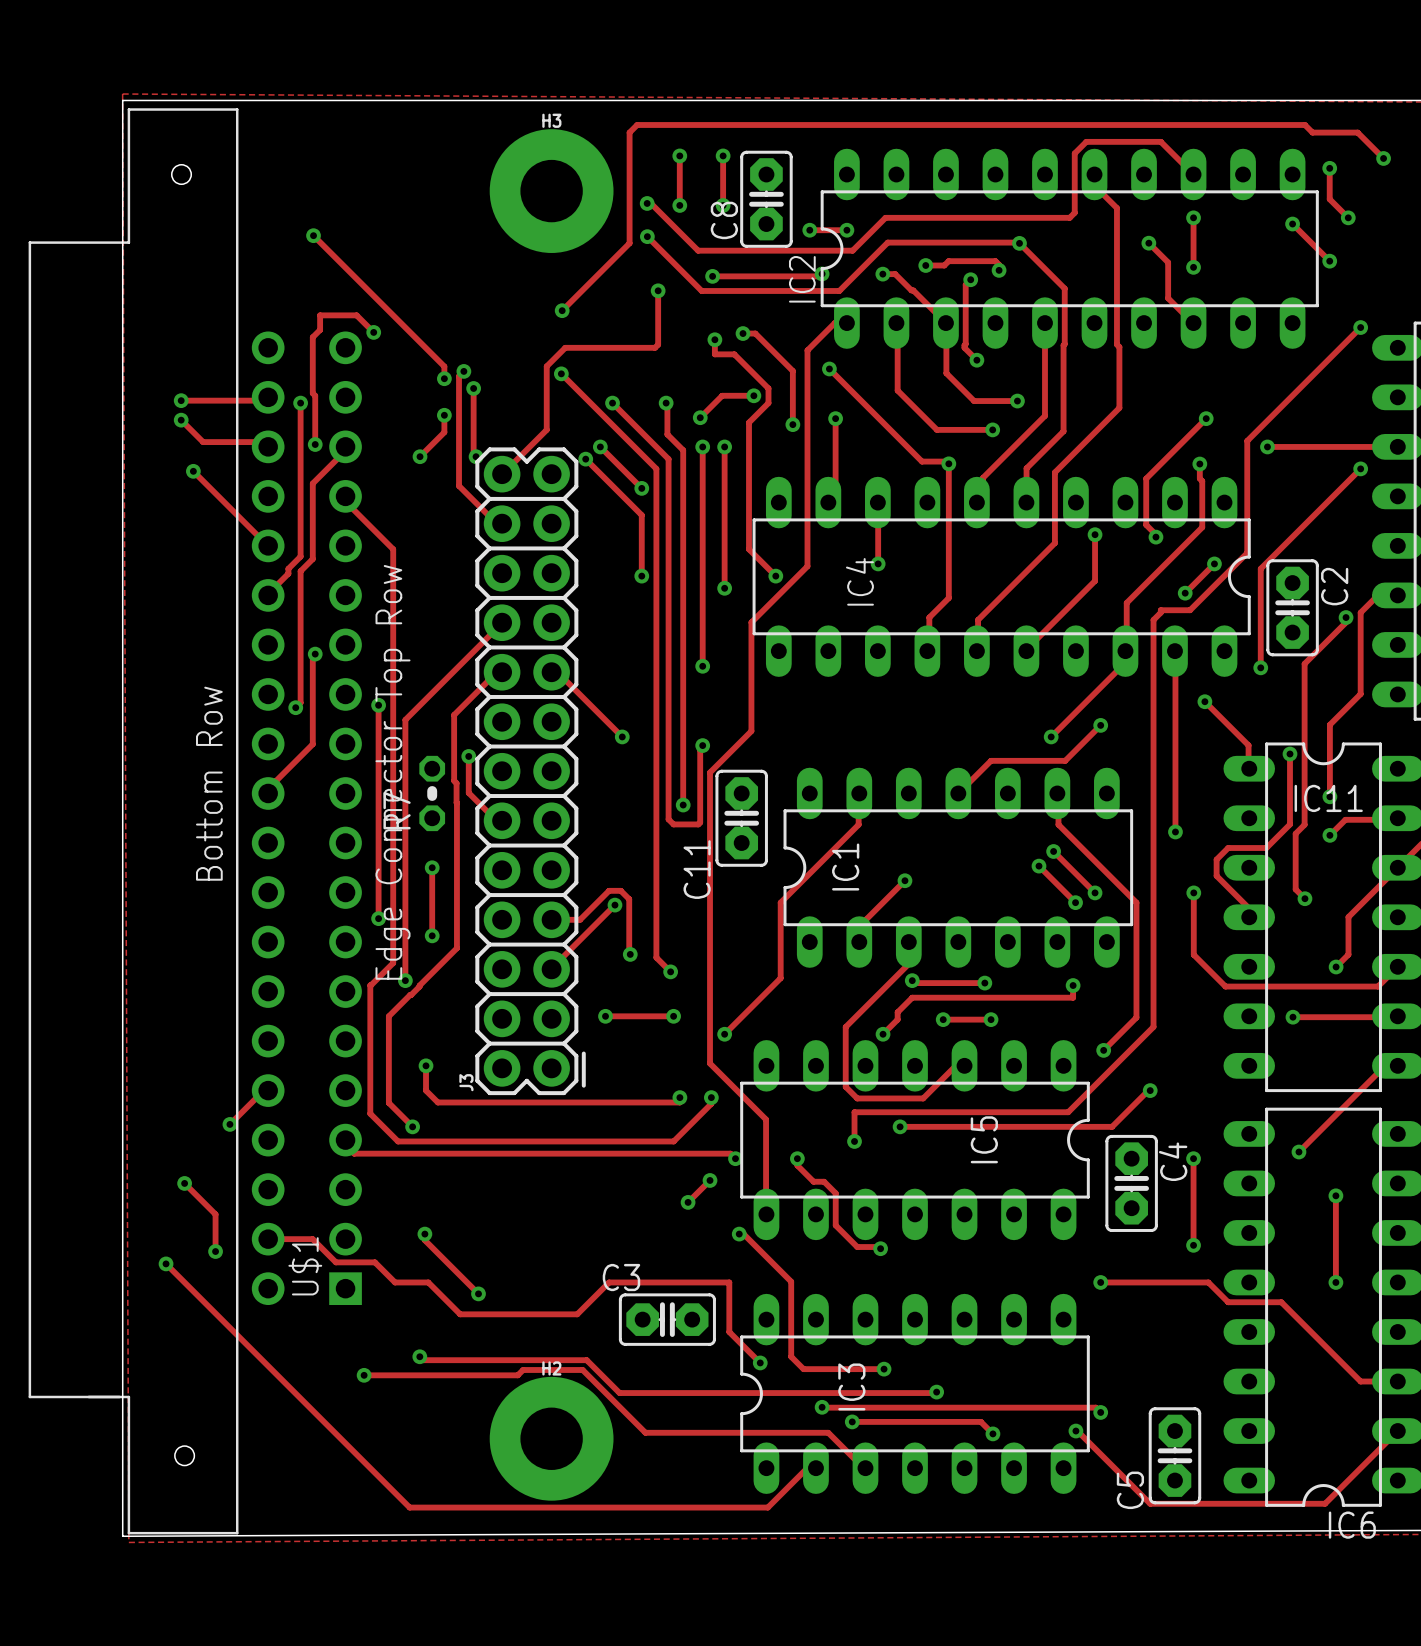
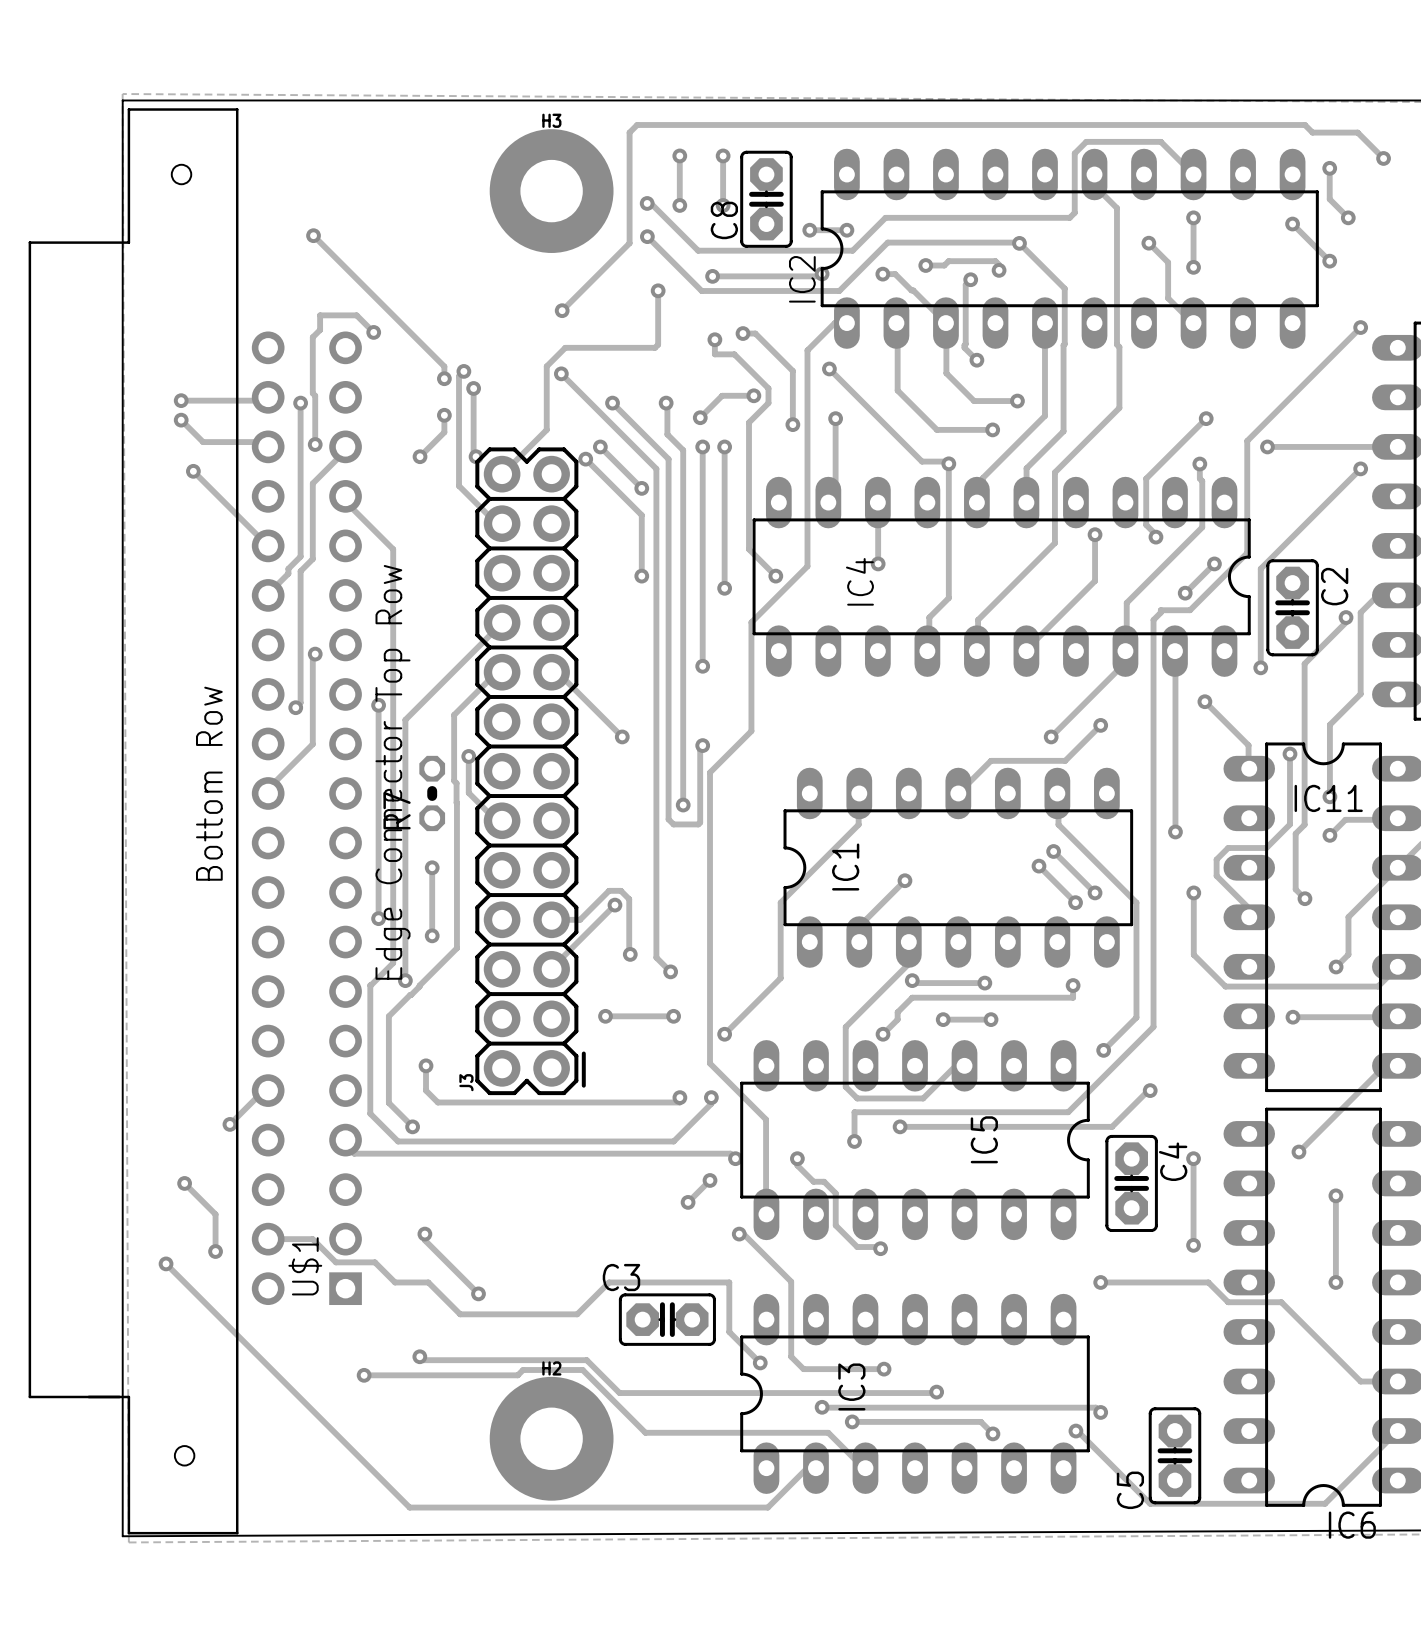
C11: (741, 818) -> none

